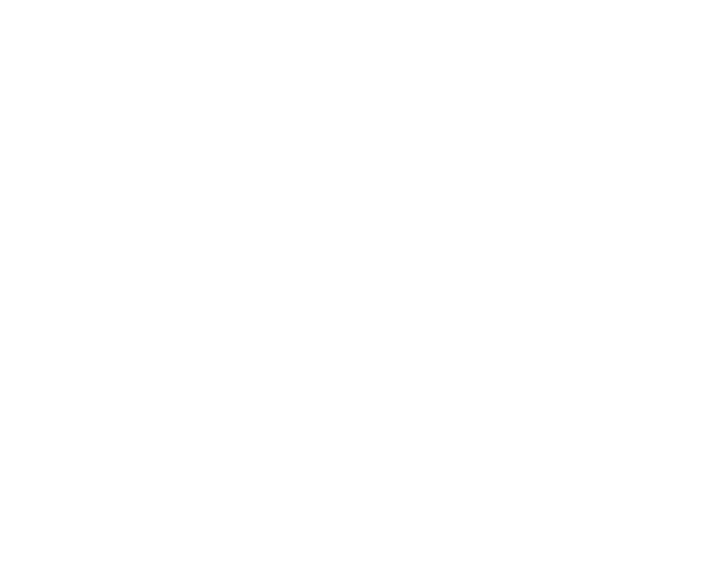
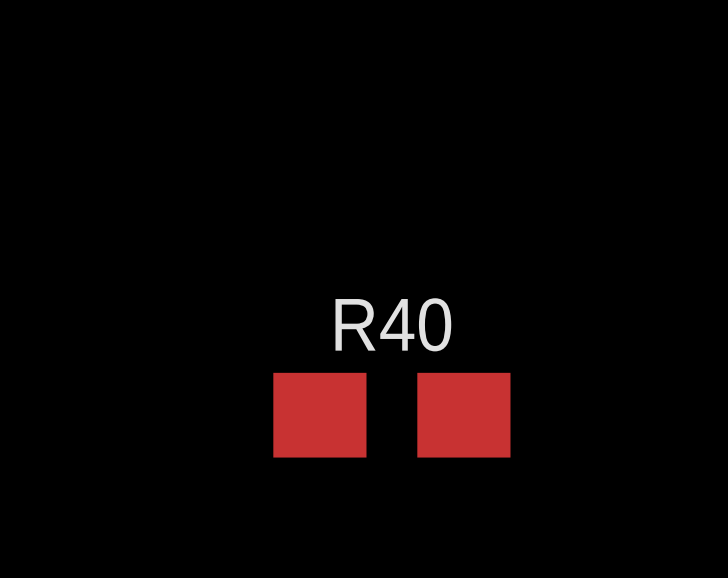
R40: none -> (391, 415)

